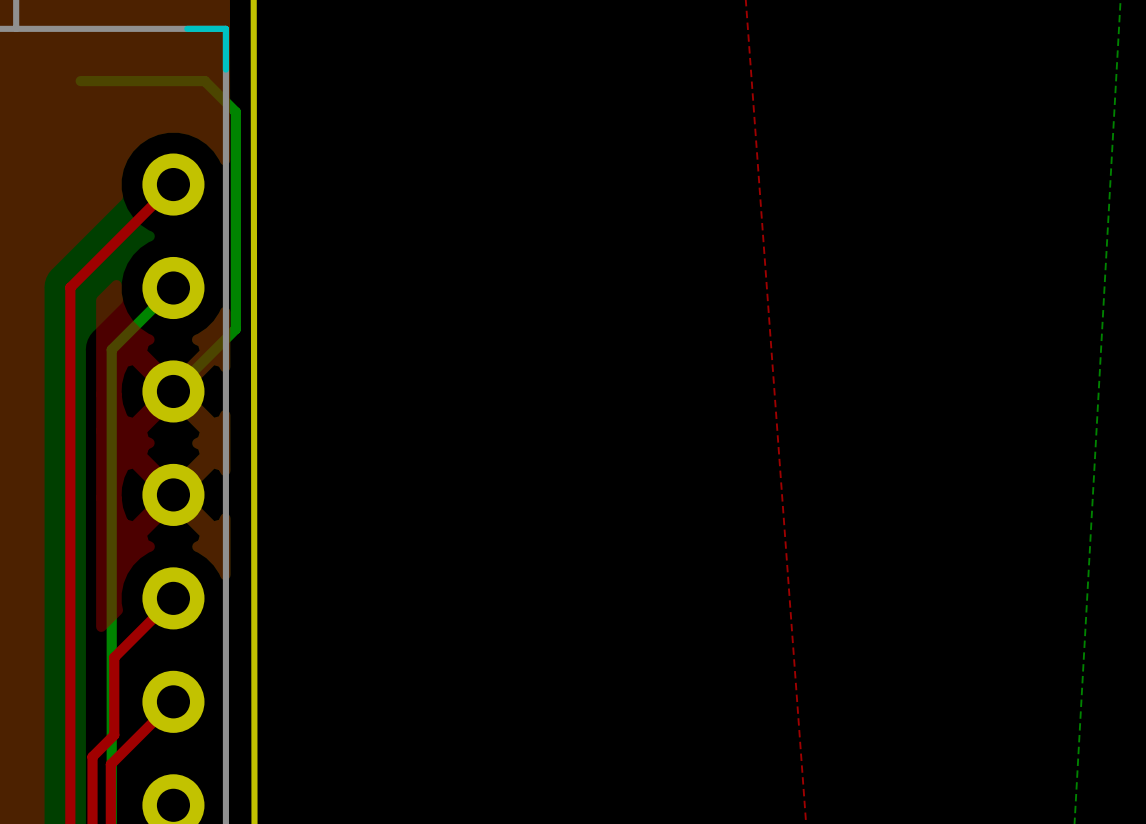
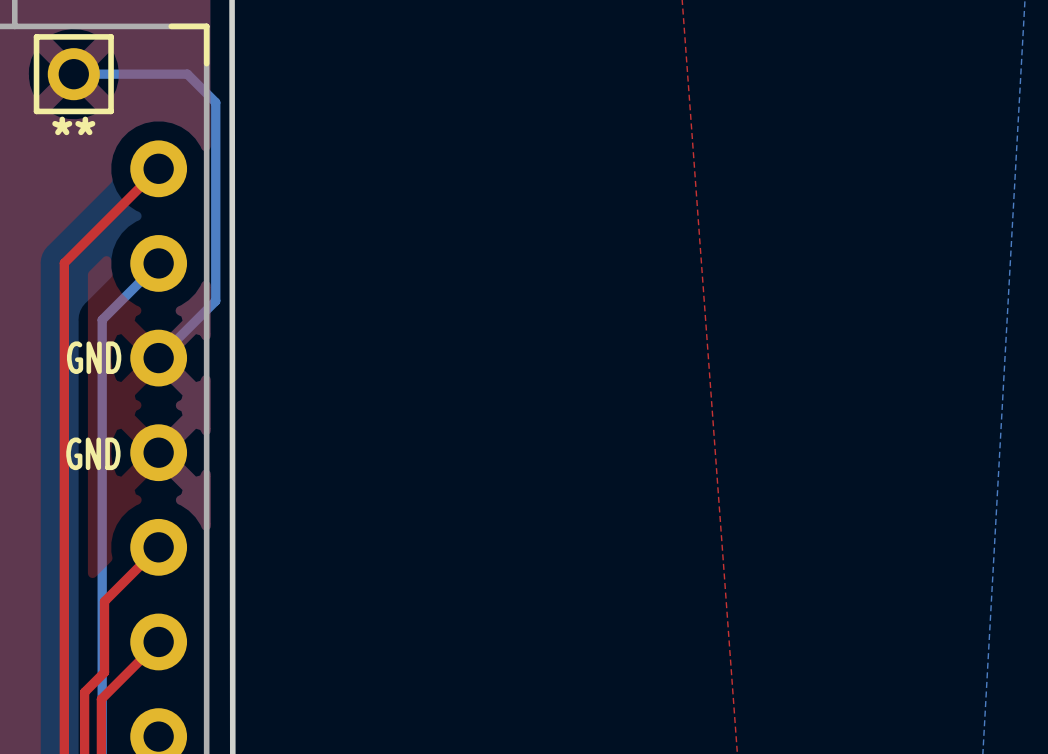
part: none -> (73, 74)
part text: none -> GND (94, 357)
part text: none -> GND (93, 453)

